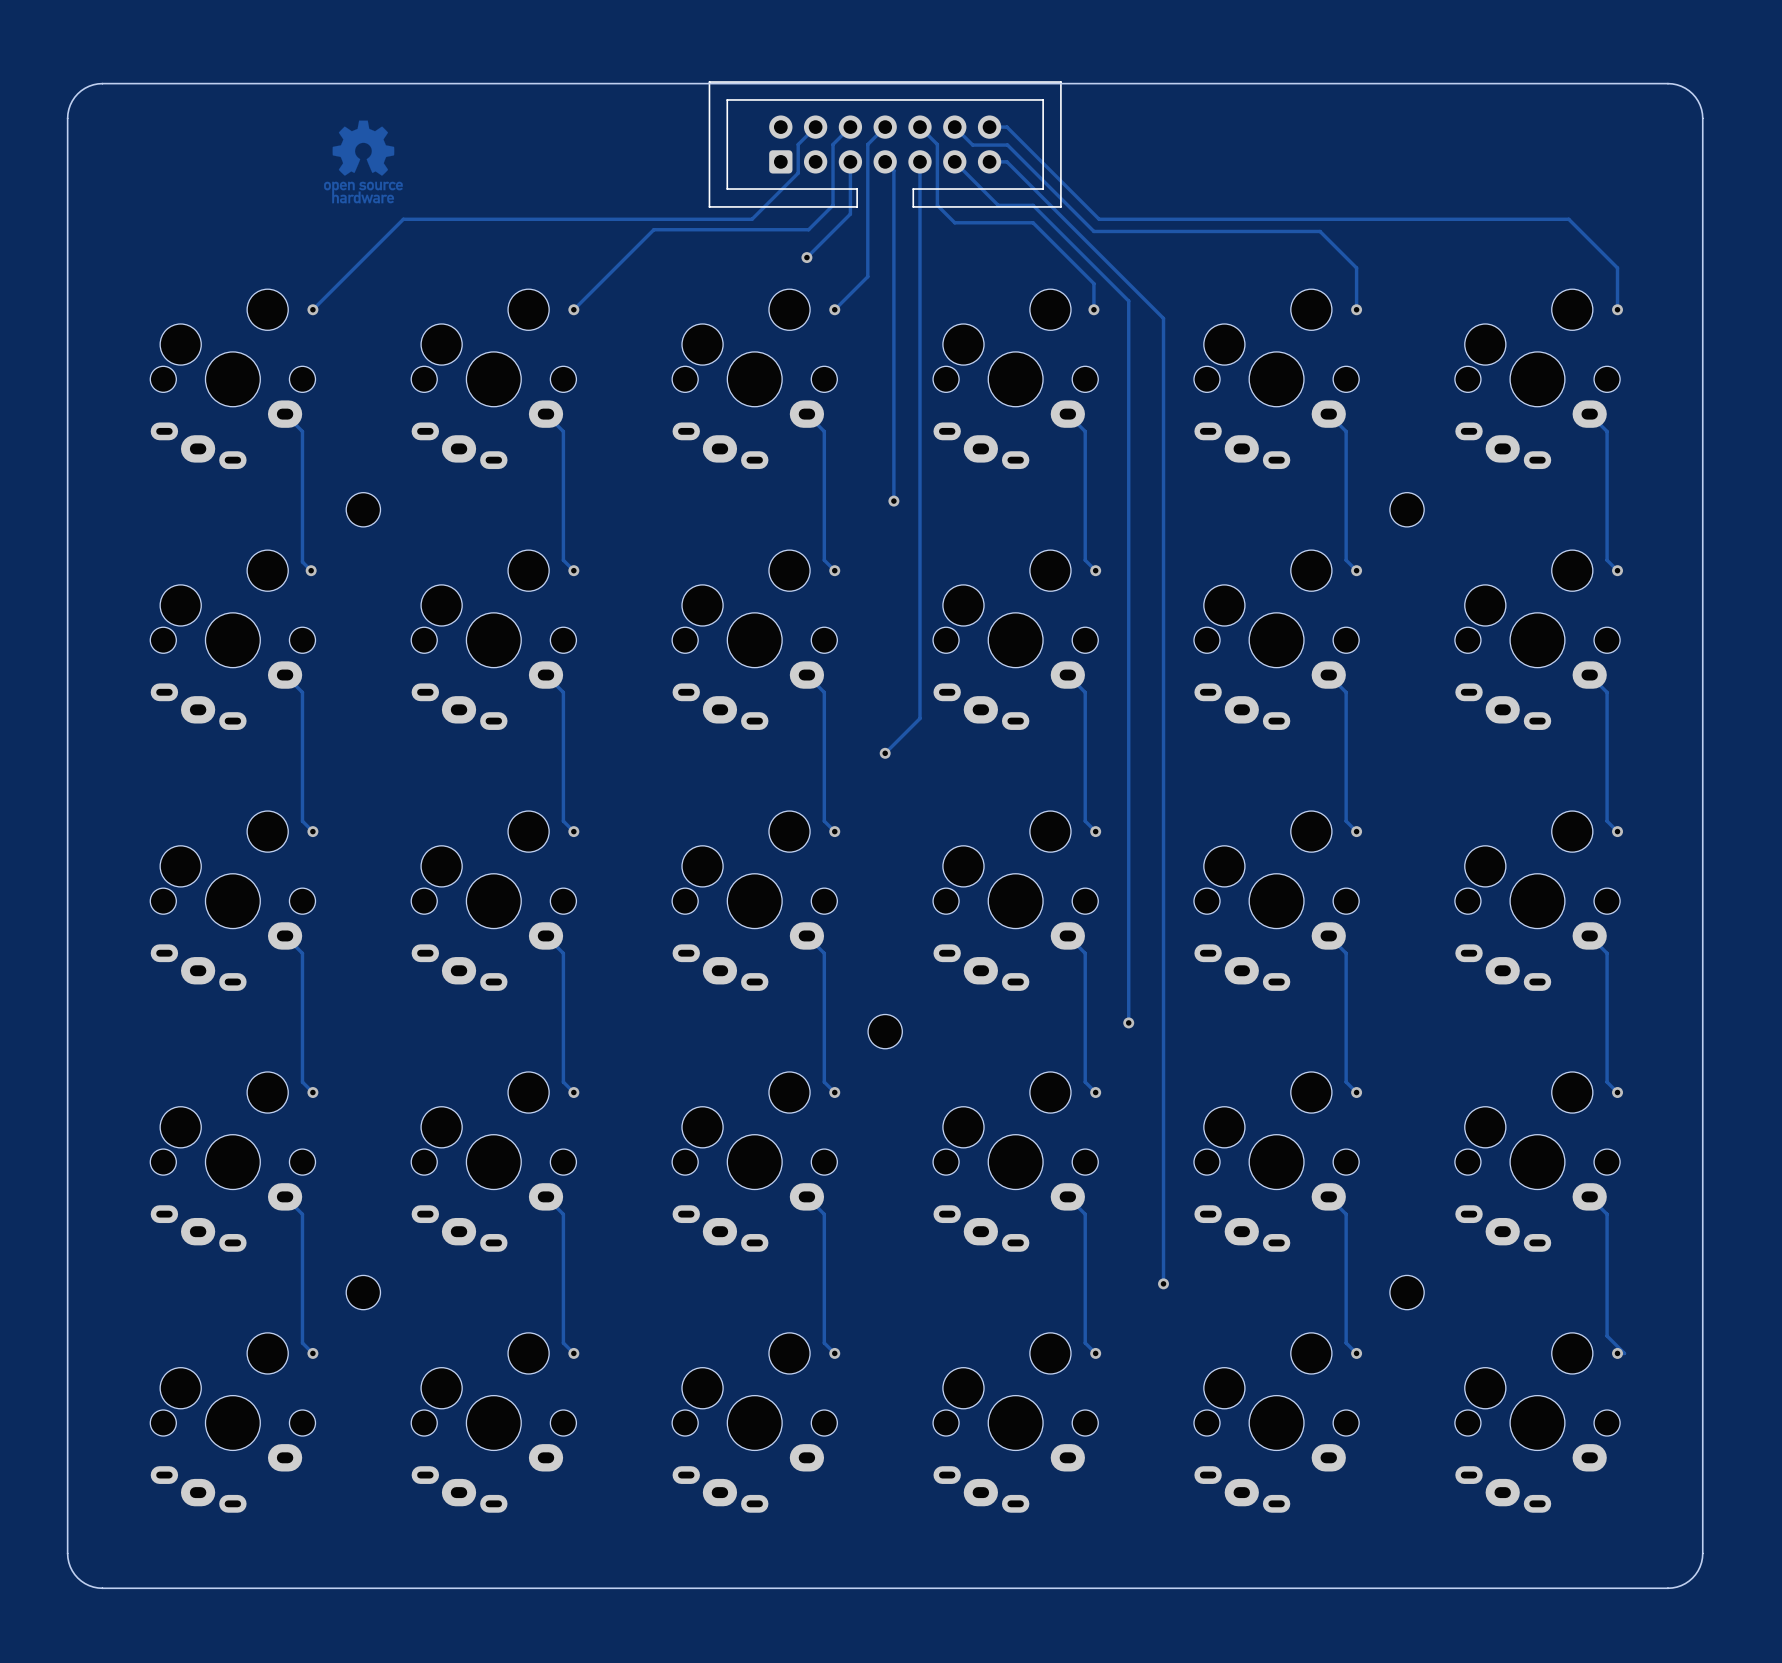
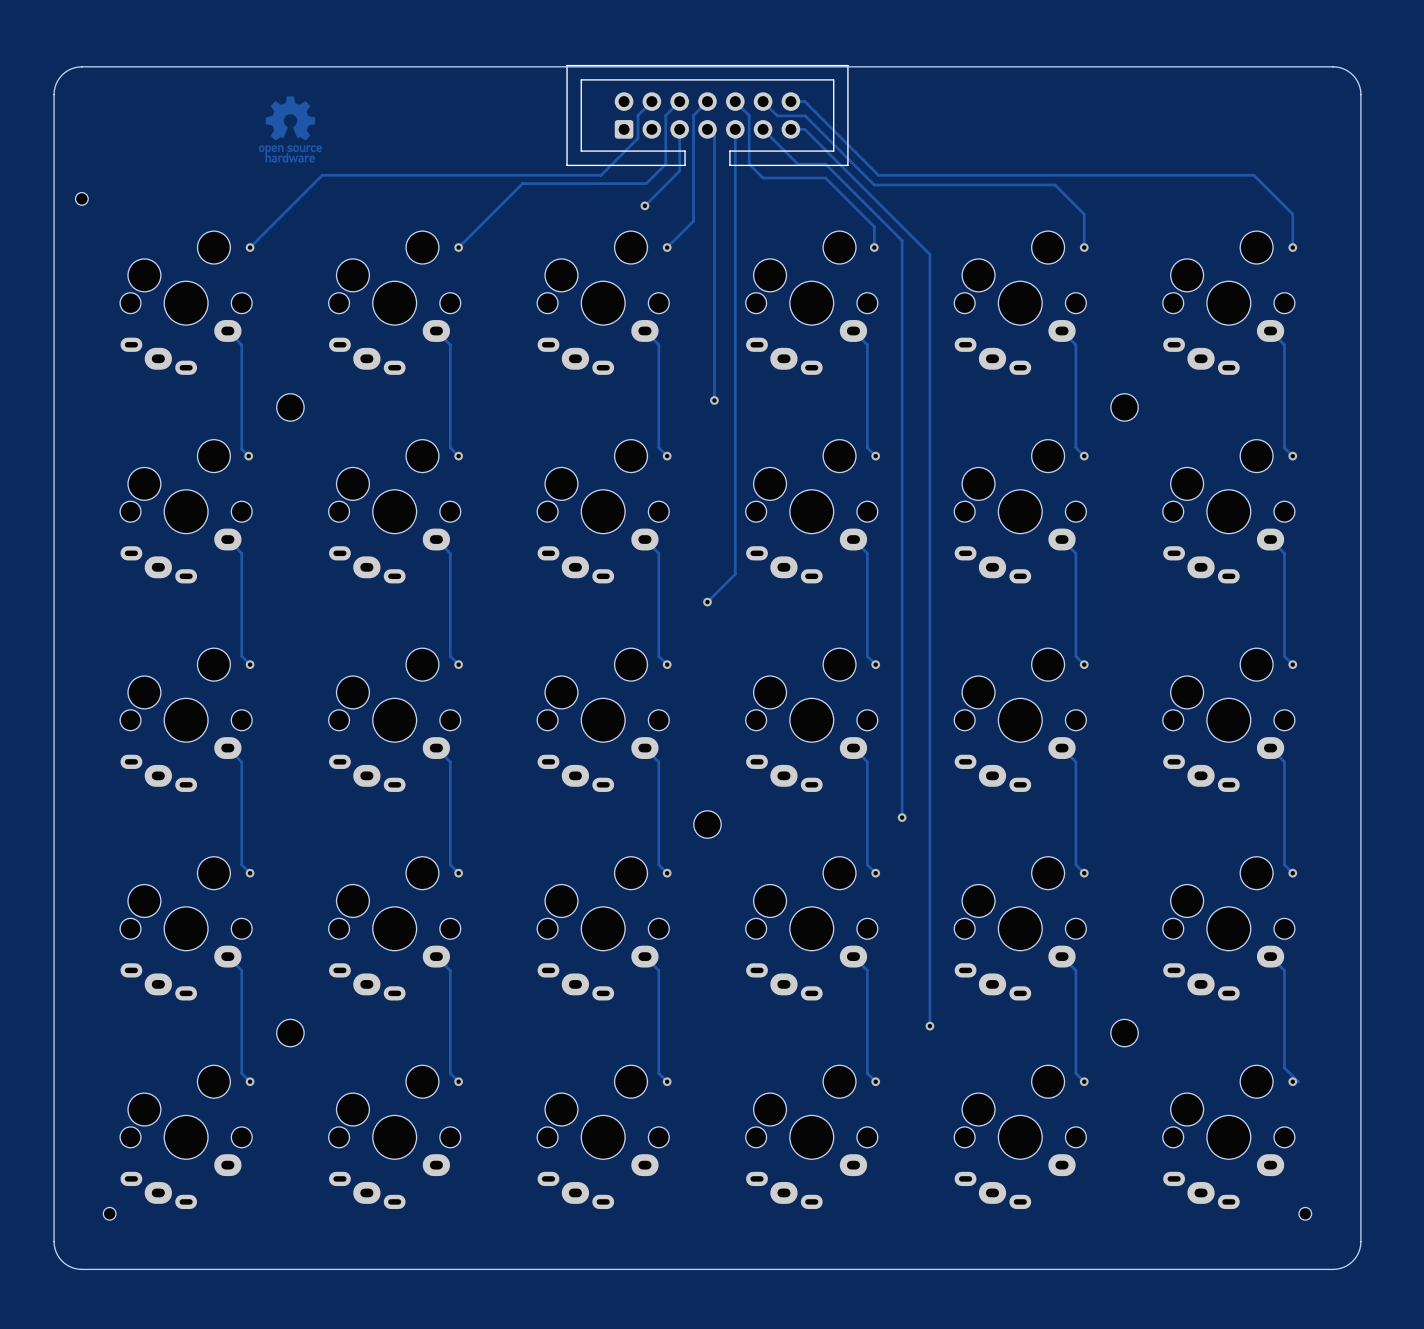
part: none -> (81, 198)
part: none -> (109, 1213)
part: none -> (1305, 1213)

